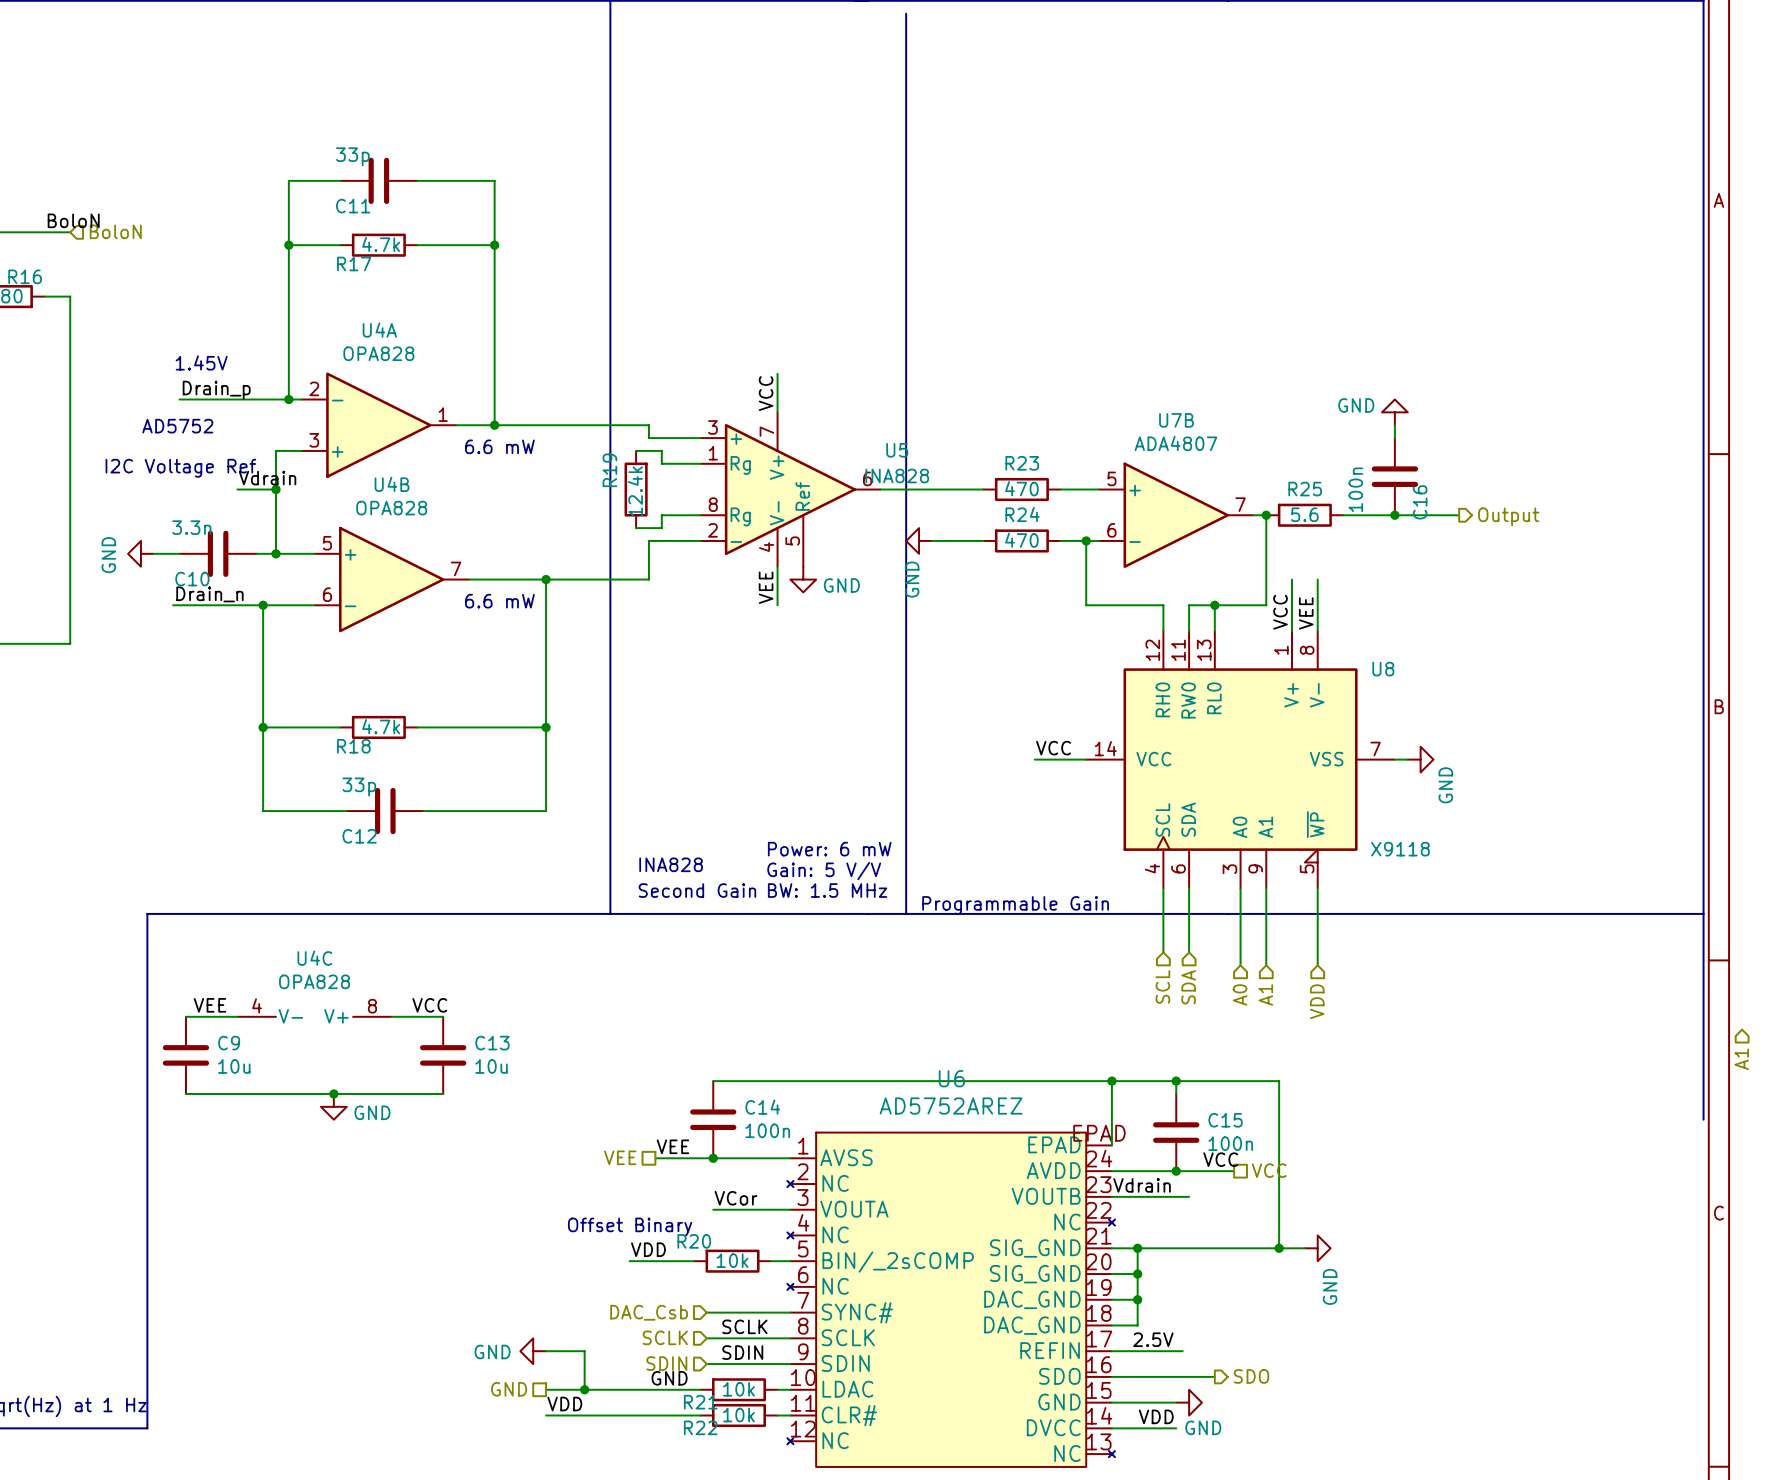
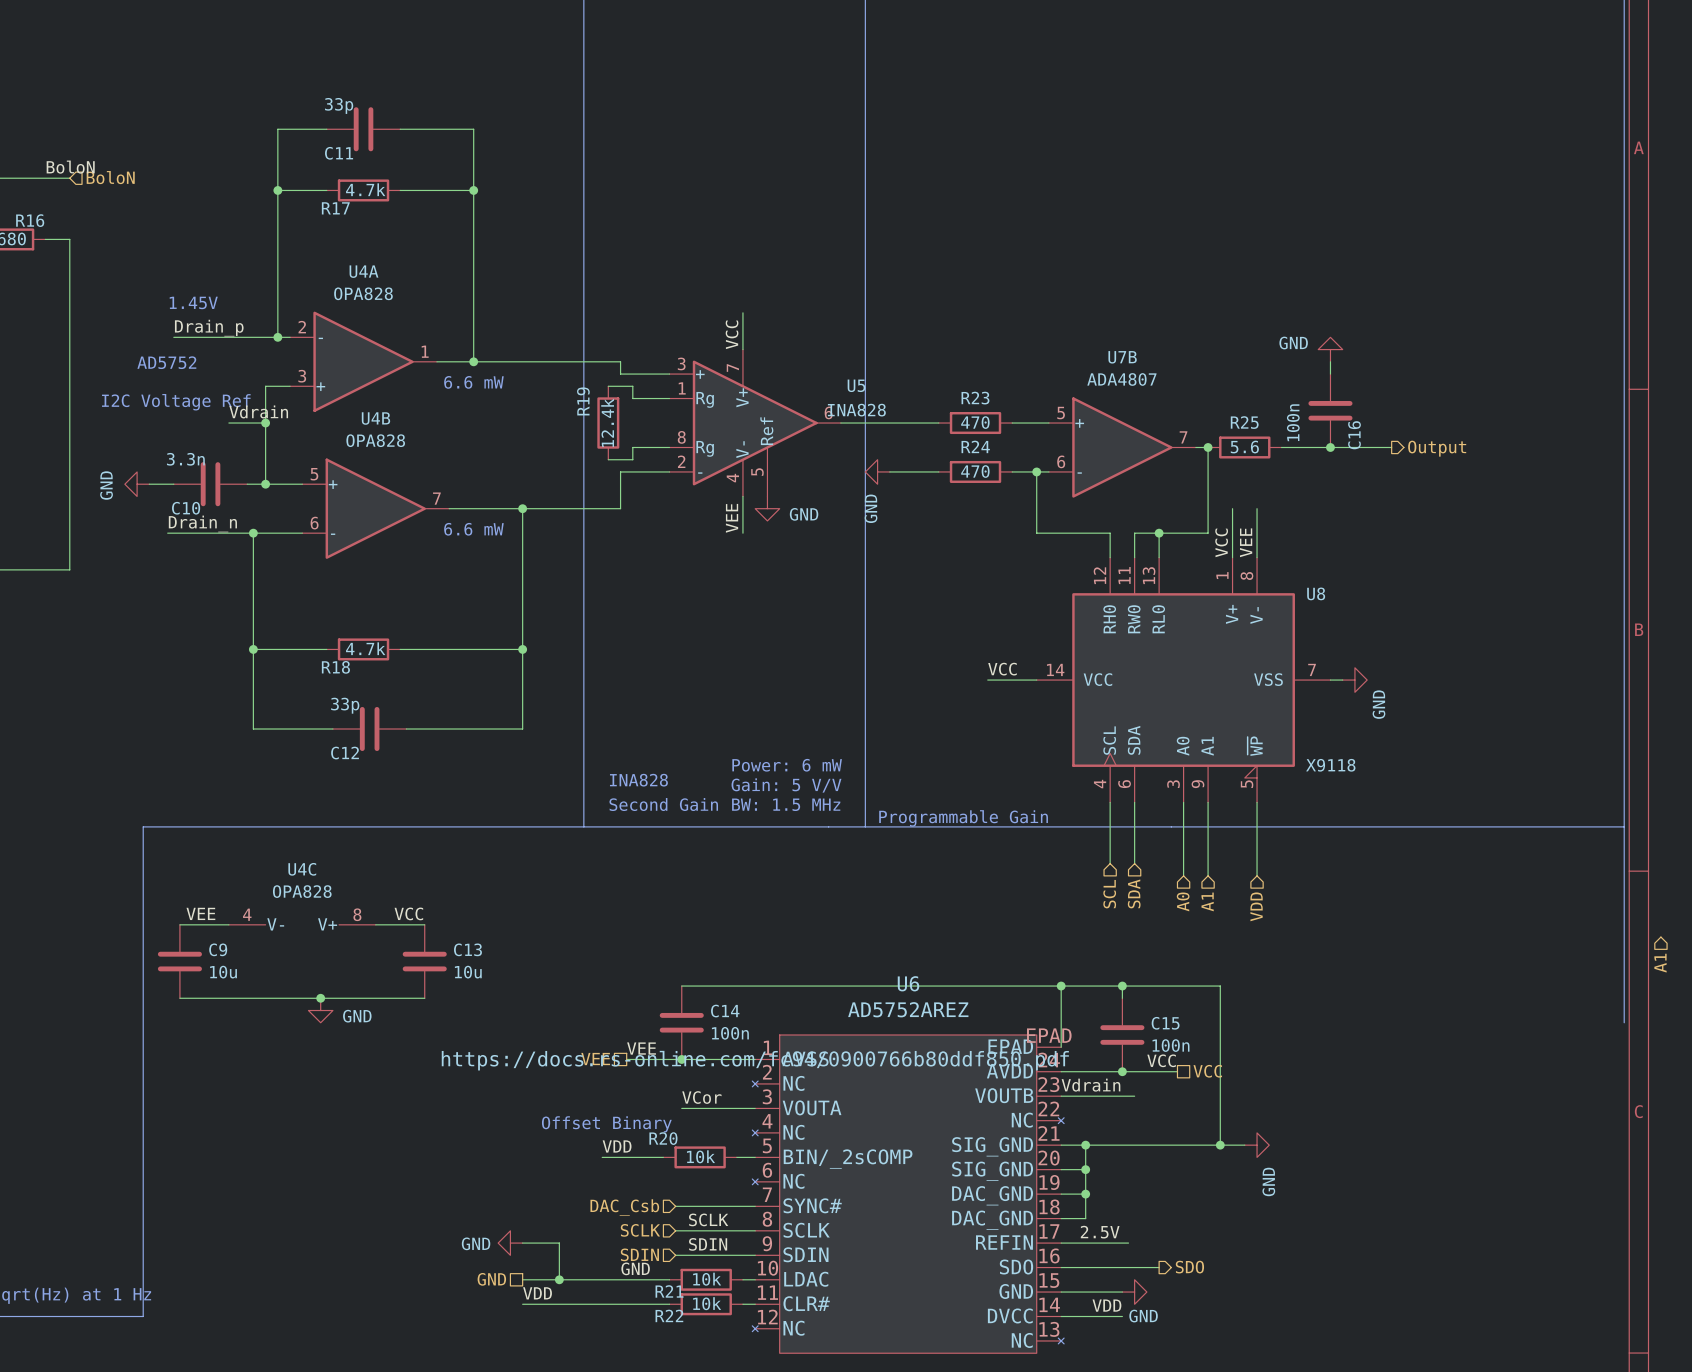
U6 text: none -> https://docs.rs-online.com/fc94/0900766b80ddf850.pdf (755, 1060)

